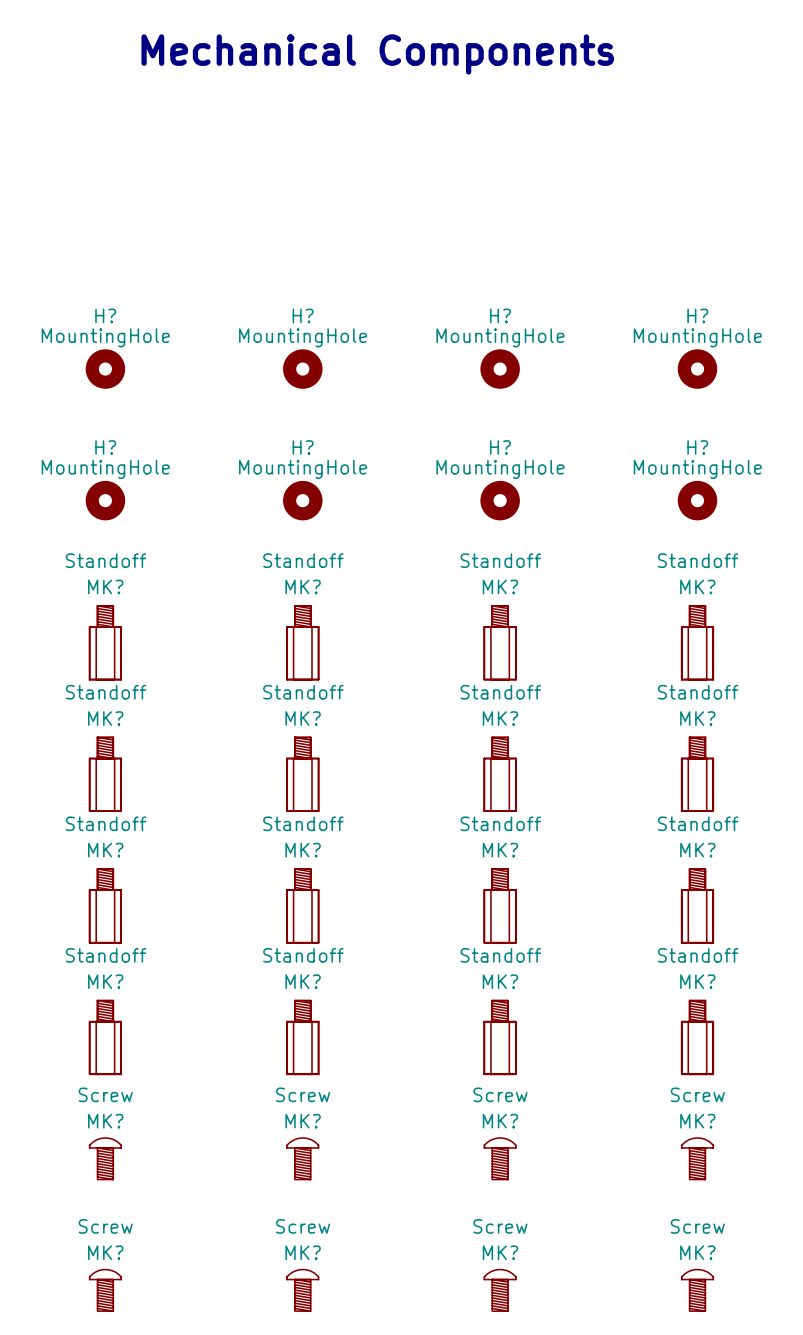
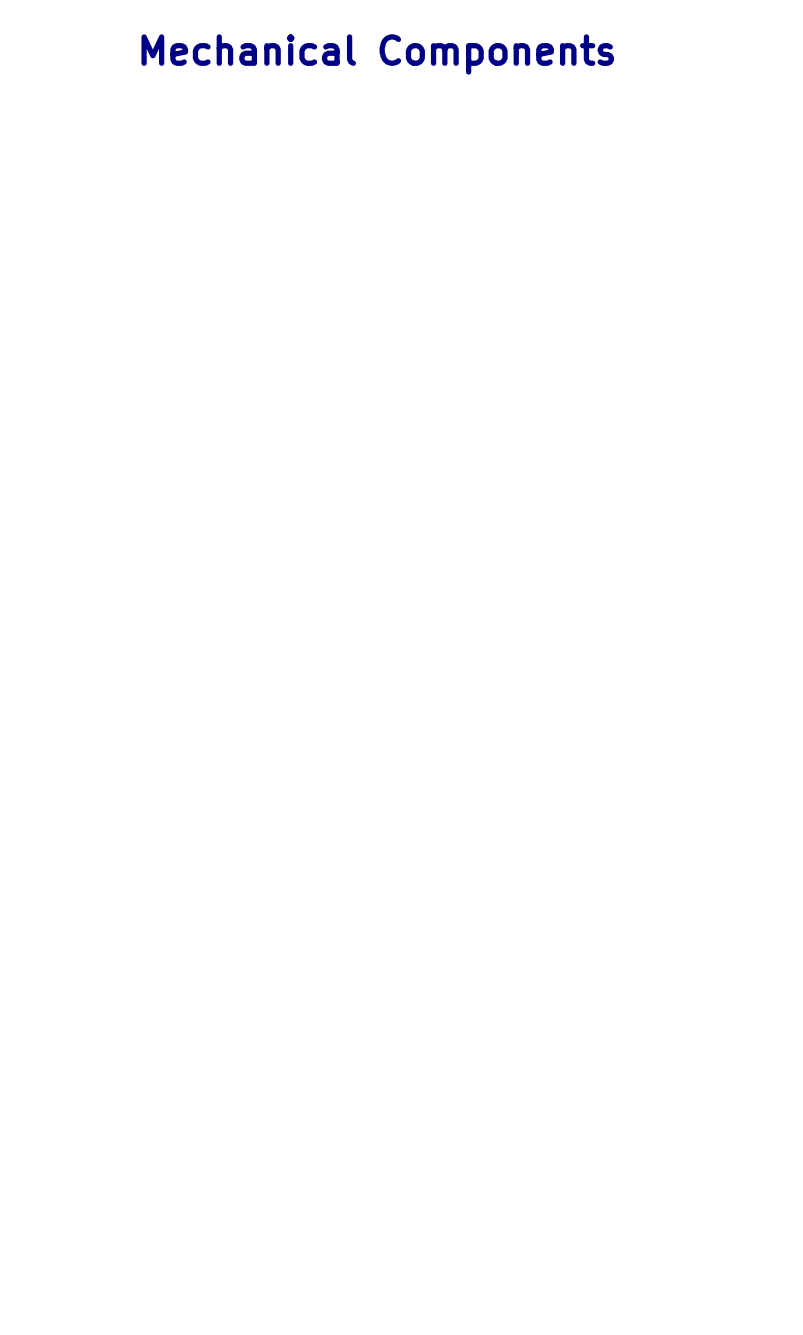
H?: MountingHole (105, 369) -> none
H?: MountingHole (302, 369) -> none
H?: MountingHole (500, 369) -> none
H?: MountingHole (697, 369) -> none
H?: MountingHole (105, 500) -> none
H?: MountingHole (302, 500) -> none
H?: MountingHole (500, 500) -> none
H?: MountingHole (697, 500) -> none
MK?: Standoff (105, 642) -> none
MK?: Standoff (302, 642) -> none
MK?: Standoff (500, 642) -> none
MK?: Standoff (697, 642) -> none
MK?: Standoff (105, 774) -> none
MK?: Standoff (302, 774) -> none
MK?: Standoff (500, 774) -> none
MK?: Standoff (697, 774) -> none
MK?: Standoff (105, 905) -> none
MK?: Standoff (302, 905) -> none
MK?: Standoff (500, 905) -> none
MK?: Standoff (697, 905) -> none
MK?: Standoff (105, 1037) -> none
MK?: Standoff (302, 1037) -> none
MK?: Standoff (500, 1037) -> none
MK?: Standoff (697, 1037) -> none
MK?: Screw (105, 1158) -> none
MK?: Screw (302, 1158) -> none
MK?: Screw (500, 1158) -> none
MK?: Screw (697, 1158) -> none
MK?: Screw (105, 1290) -> none
MK?: Screw (302, 1290) -> none
MK?: Screw (500, 1290) -> none
MK?: Screw (697, 1290) -> none

